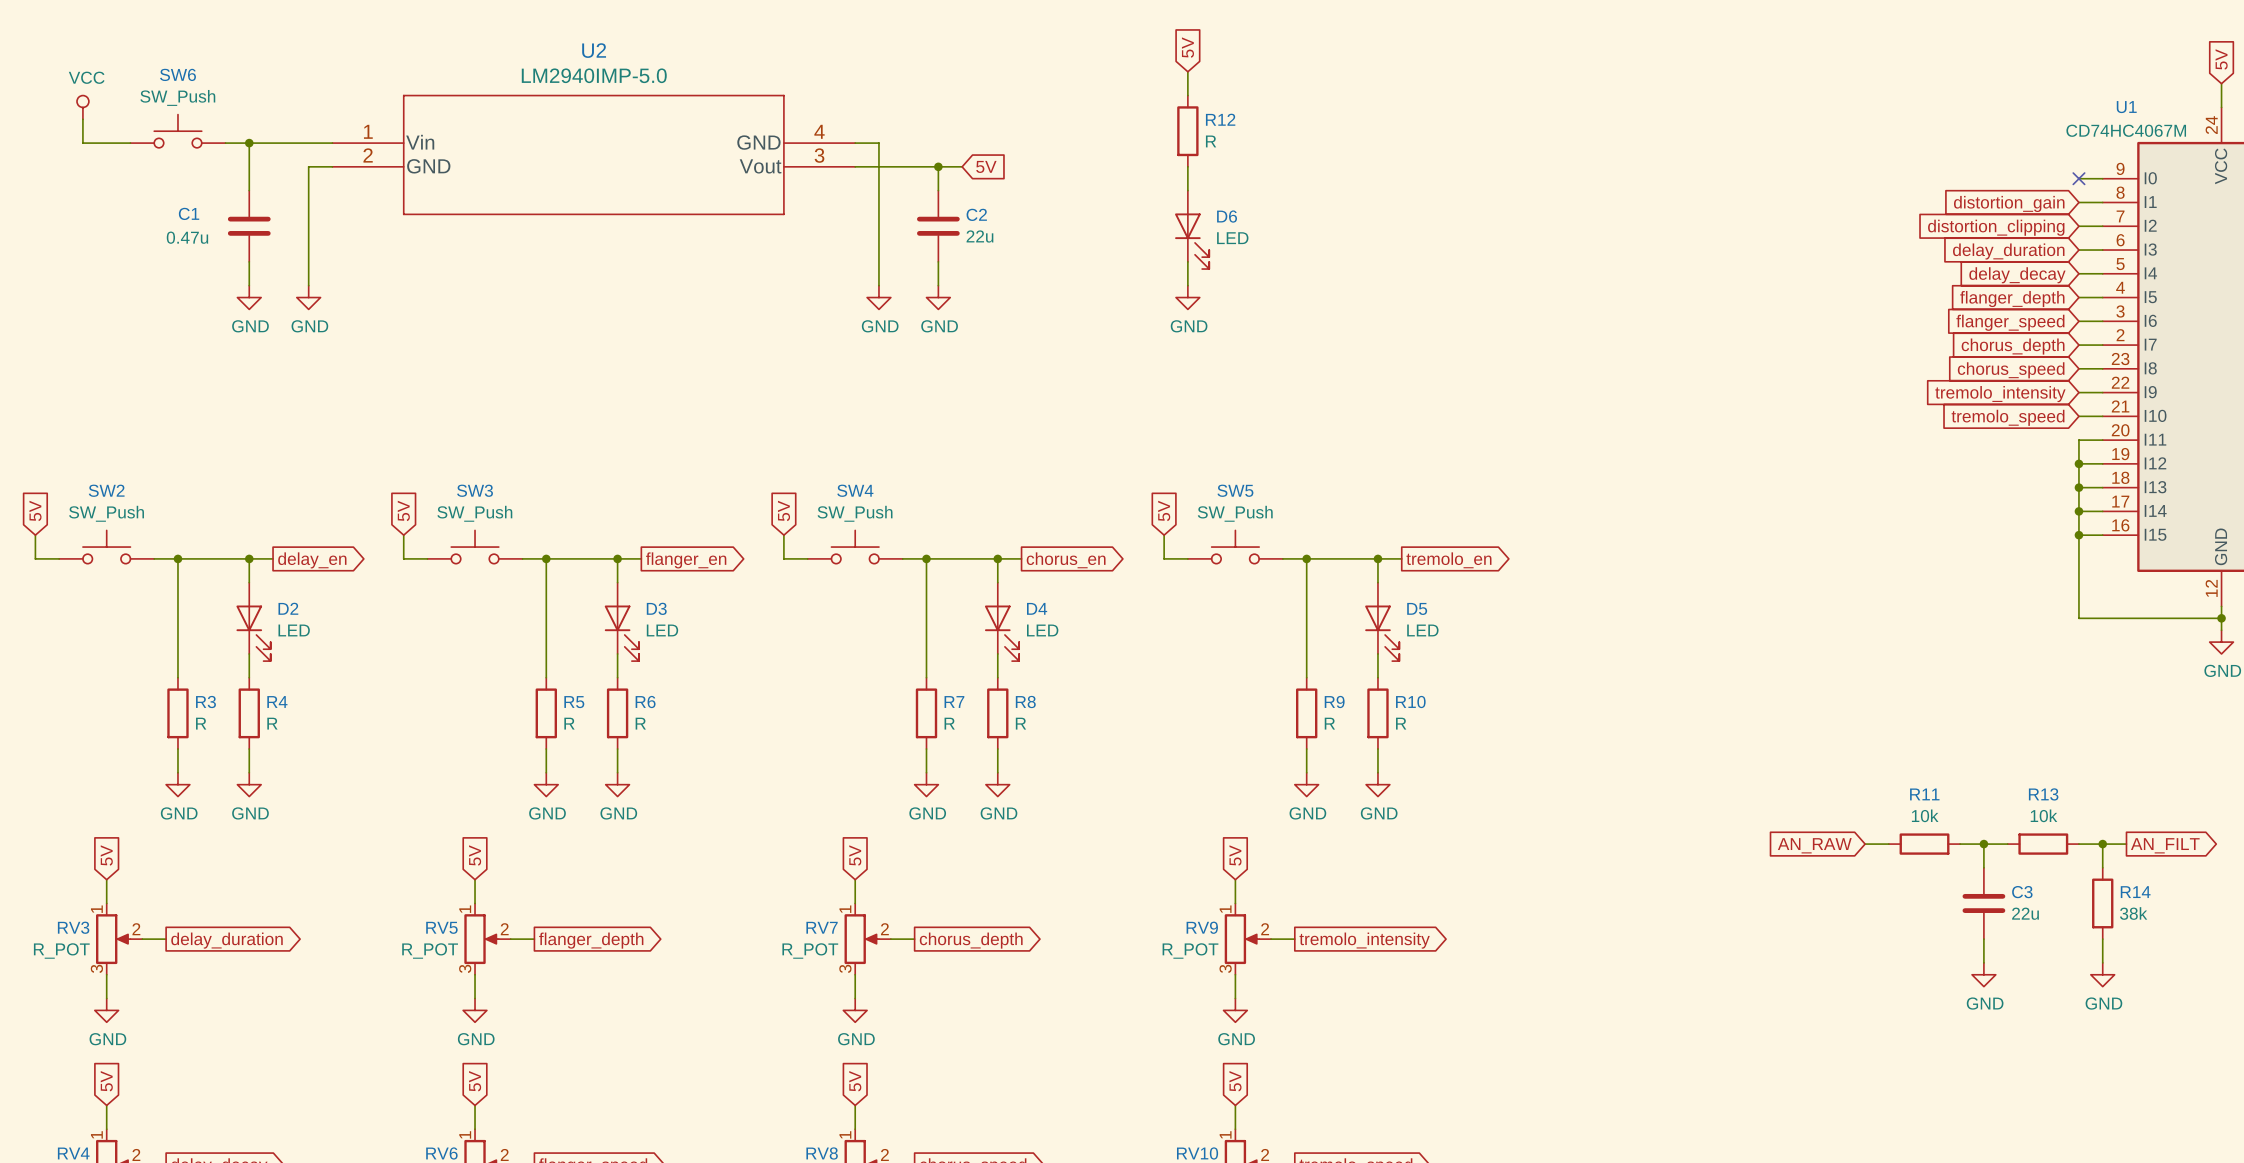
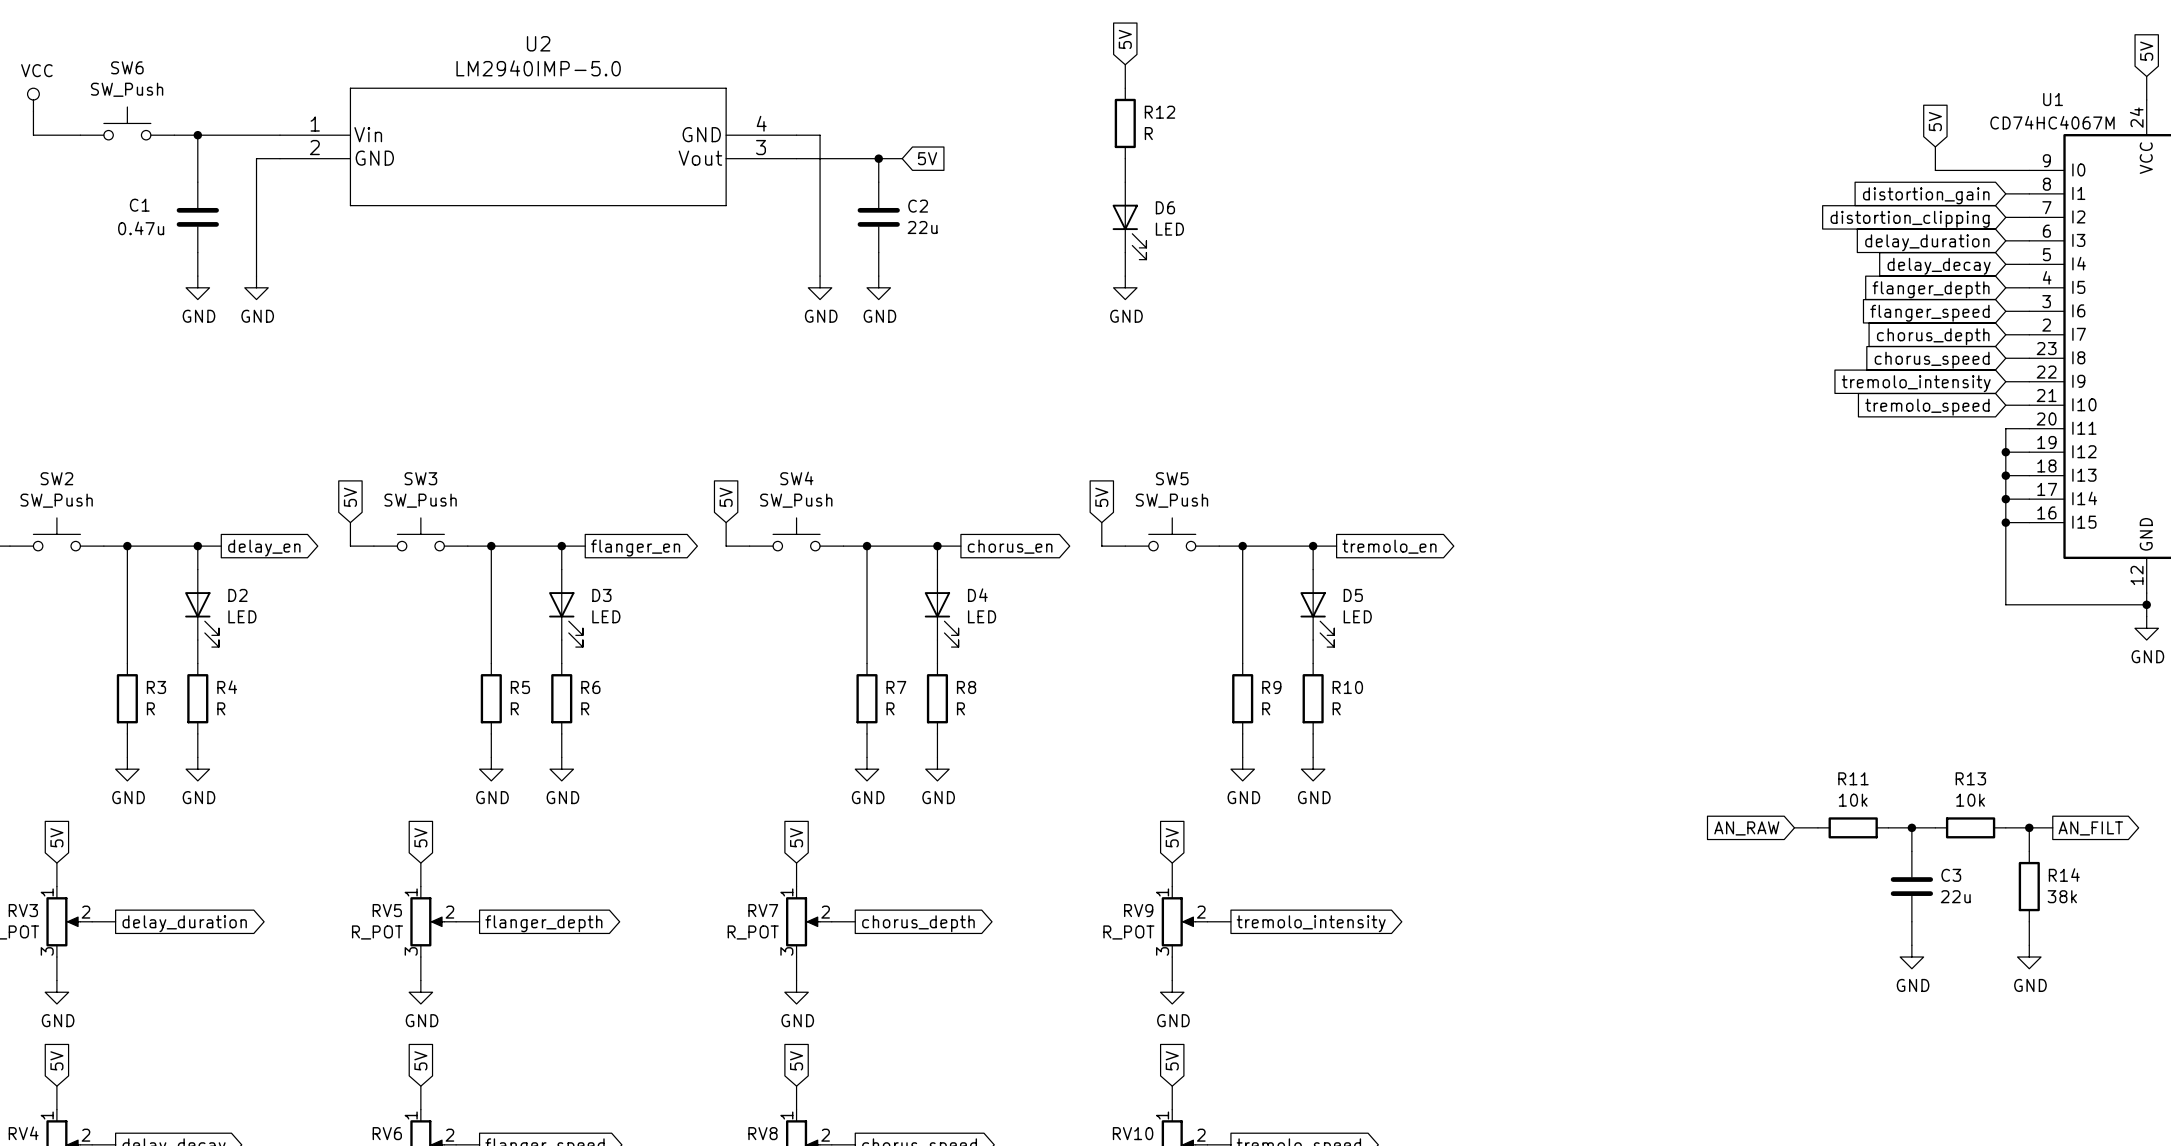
global label: none -> 5V (1935, 121)
wire: none -> (1935, 146) (1935, 170) (2005, 170)
no-connect mark: (2078, 178) -> none

